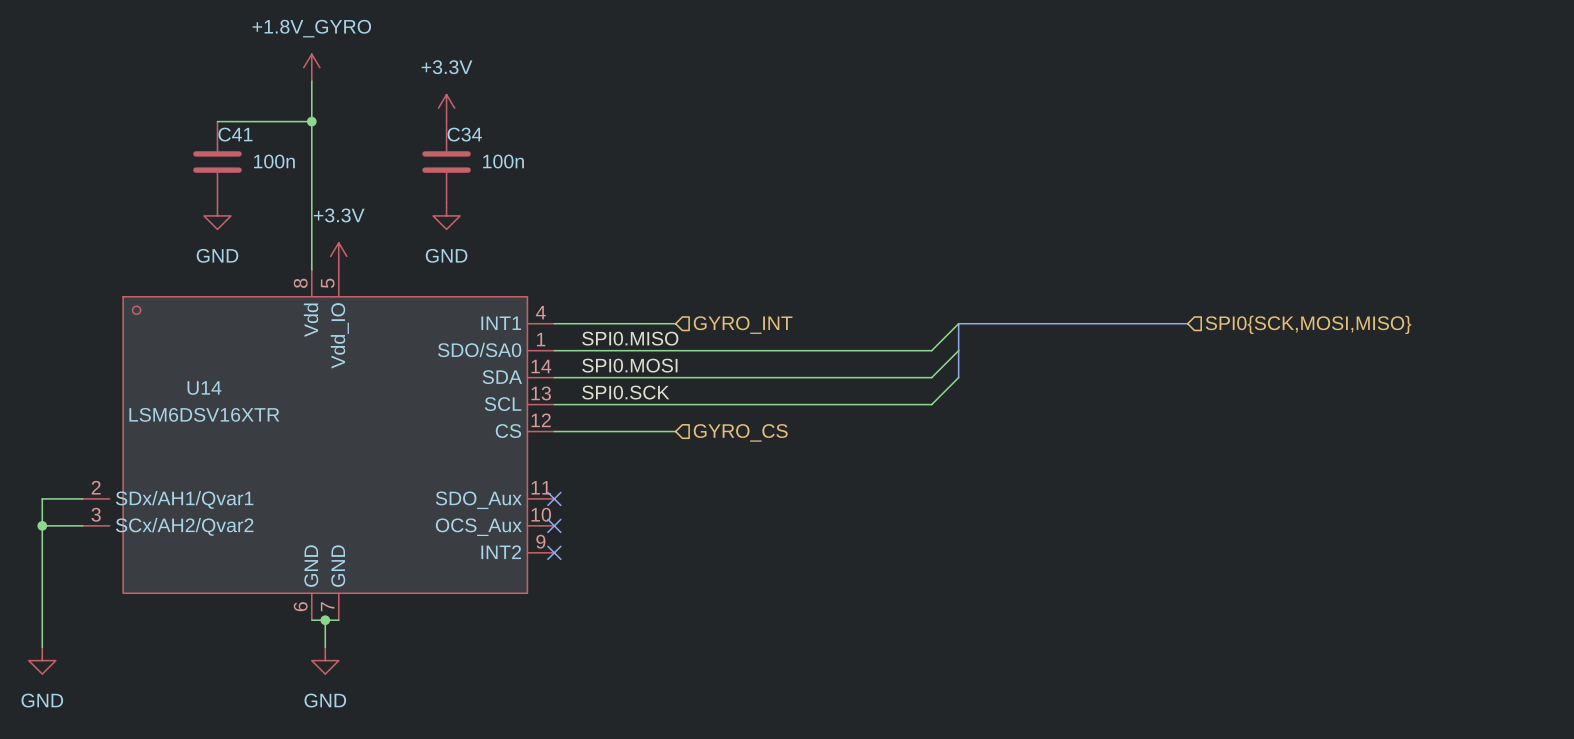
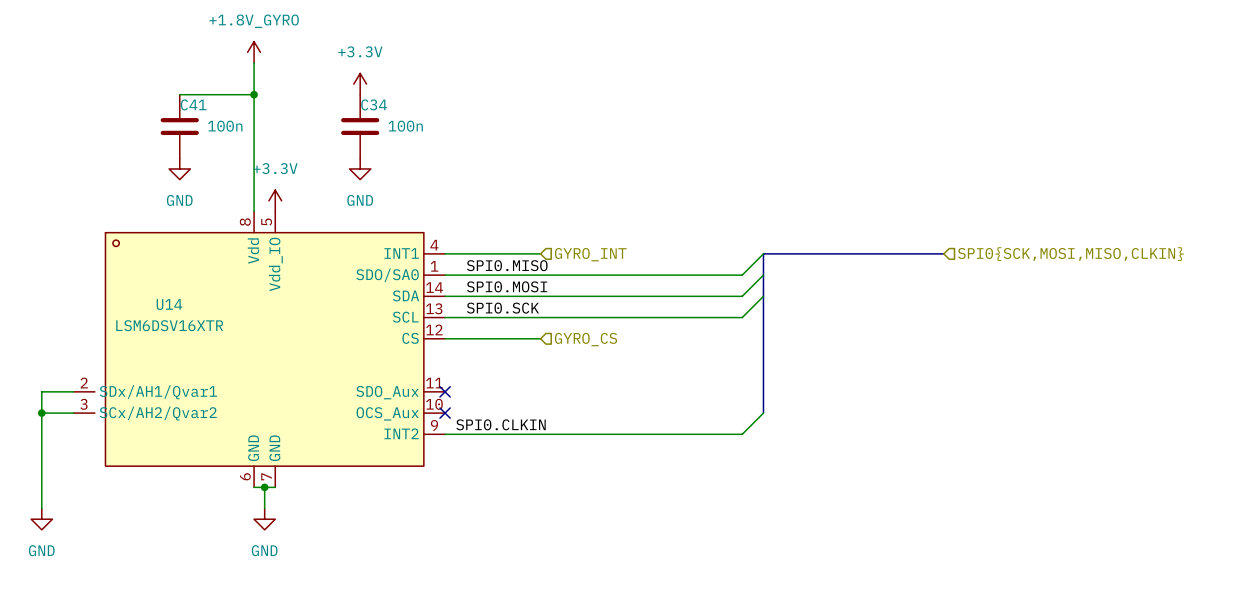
hierarchical label: SPI0{SCK,MOSI,MISO} (1308, 324) -> SPI0{SCK,MOSI,MISO,CLKIN} (1070, 254)
bus: none -> (763, 296) (763, 413)
wire: none -> (763, 413) (742, 434) (445, 434)
label: none -> SPI0.CLKIN (501, 424)
no-connect mark: (554, 552) -> none

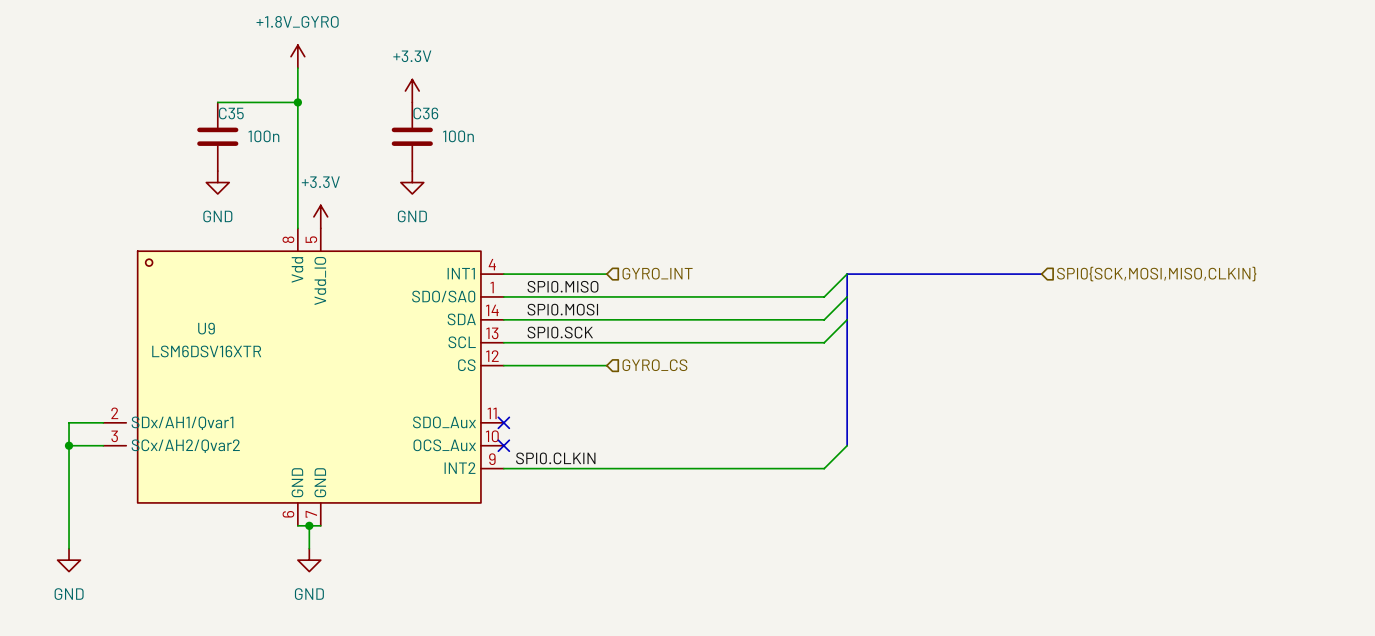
C41 name: C41 (193, 104) -> C35 (231, 113)
C34 name: C34 (374, 104) -> C36 (425, 113)
U14 name: U14 (169, 304) -> U9 (206, 328)

